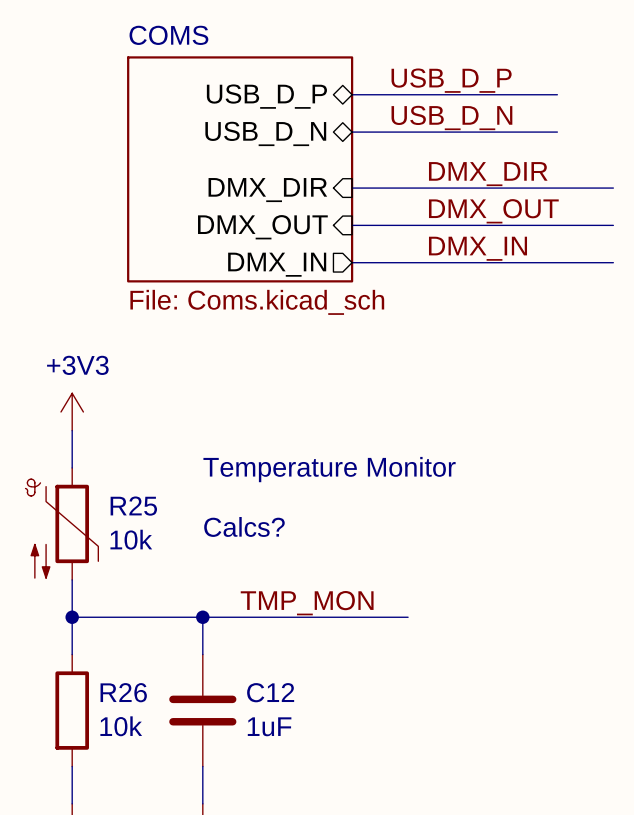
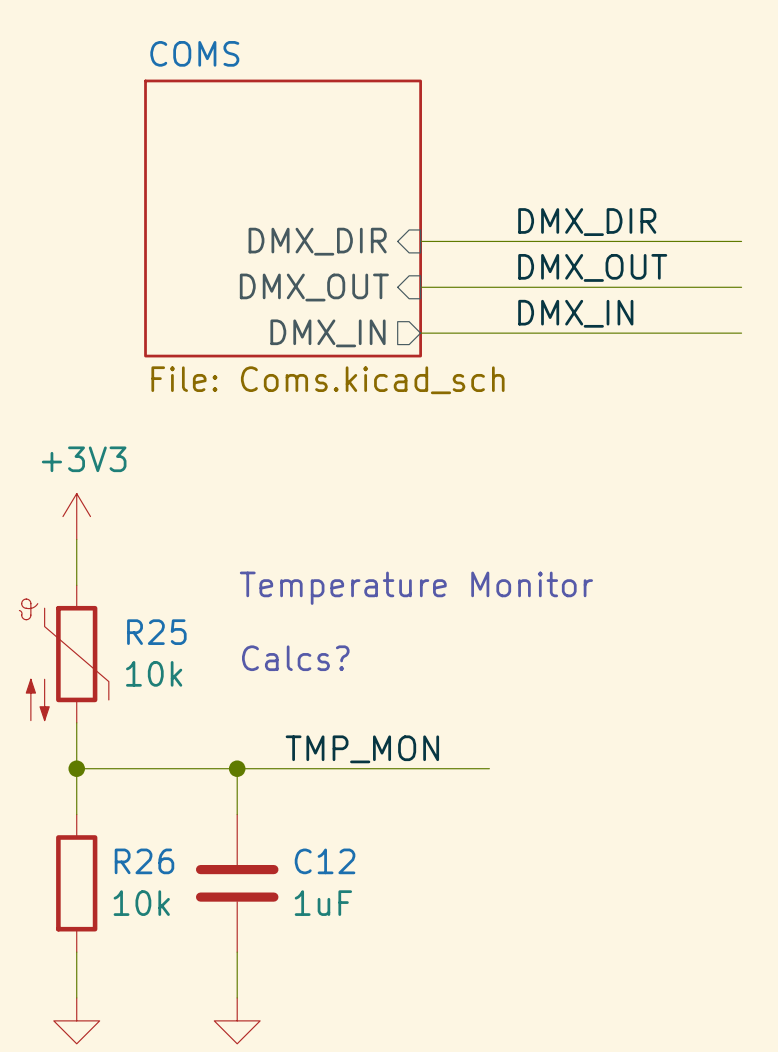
label: USB_D_P (451, 80) -> none
wire: (352, 94) (557, 94) -> none
sheet pin: USB_D_P (266, 96) -> none
label: USB_D_N (451, 117) -> none
wire: (352, 132) (557, 132) -> none
sheet pin: USB_D_N (265, 133) -> none

